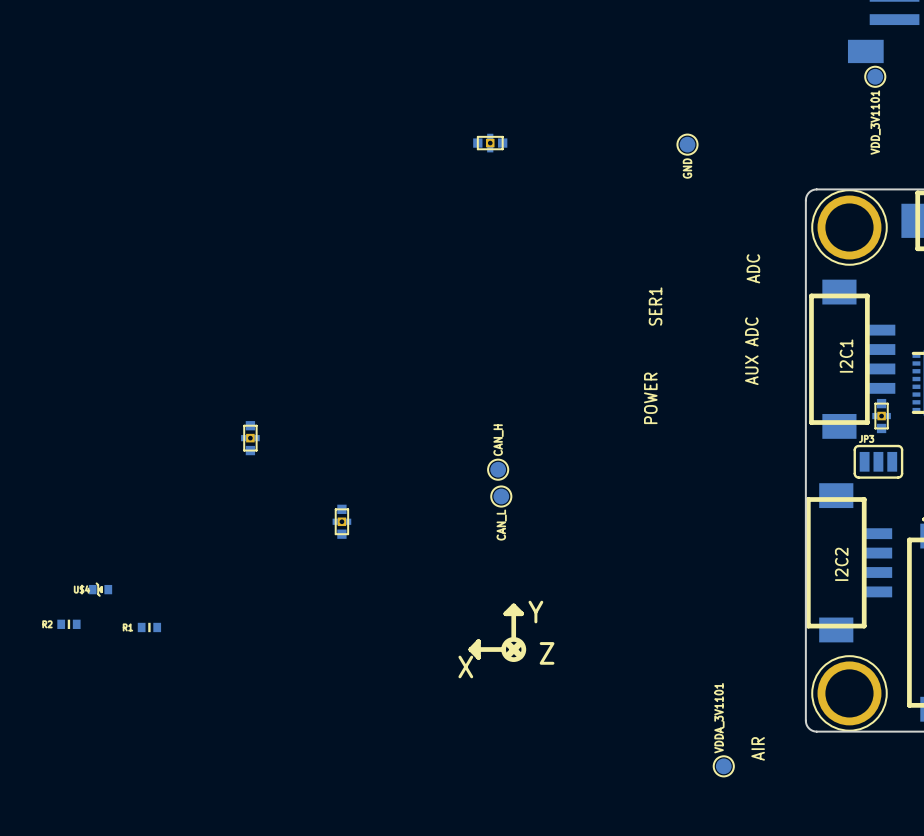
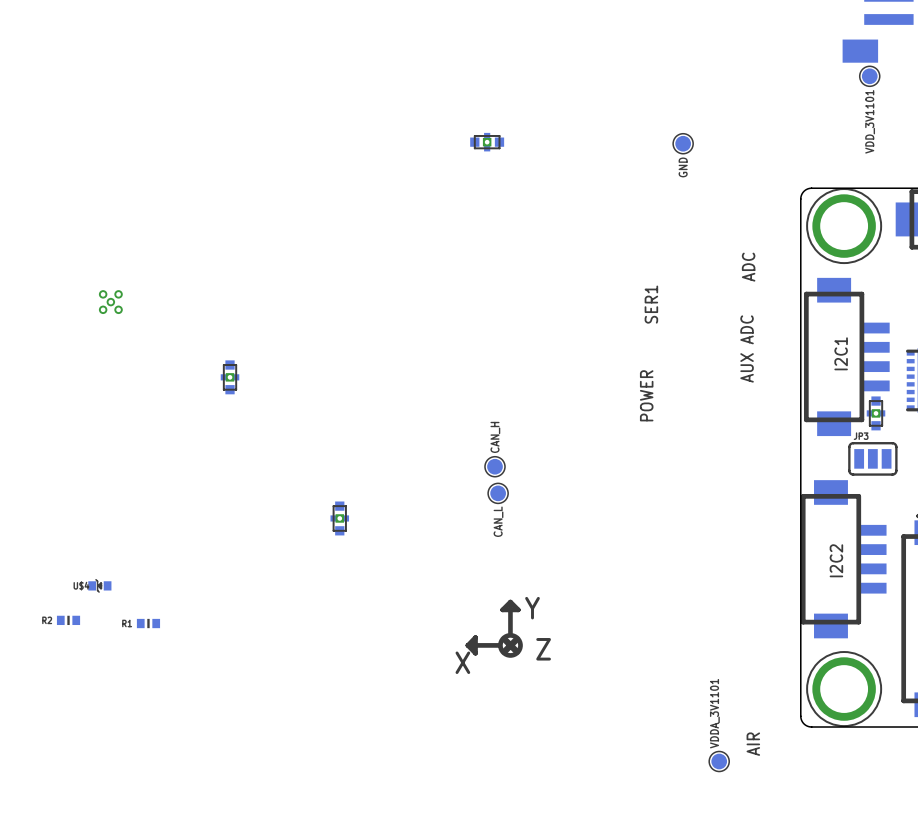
part: none -> (110, 302)
part position: (250, 438) -> (230, 377)

